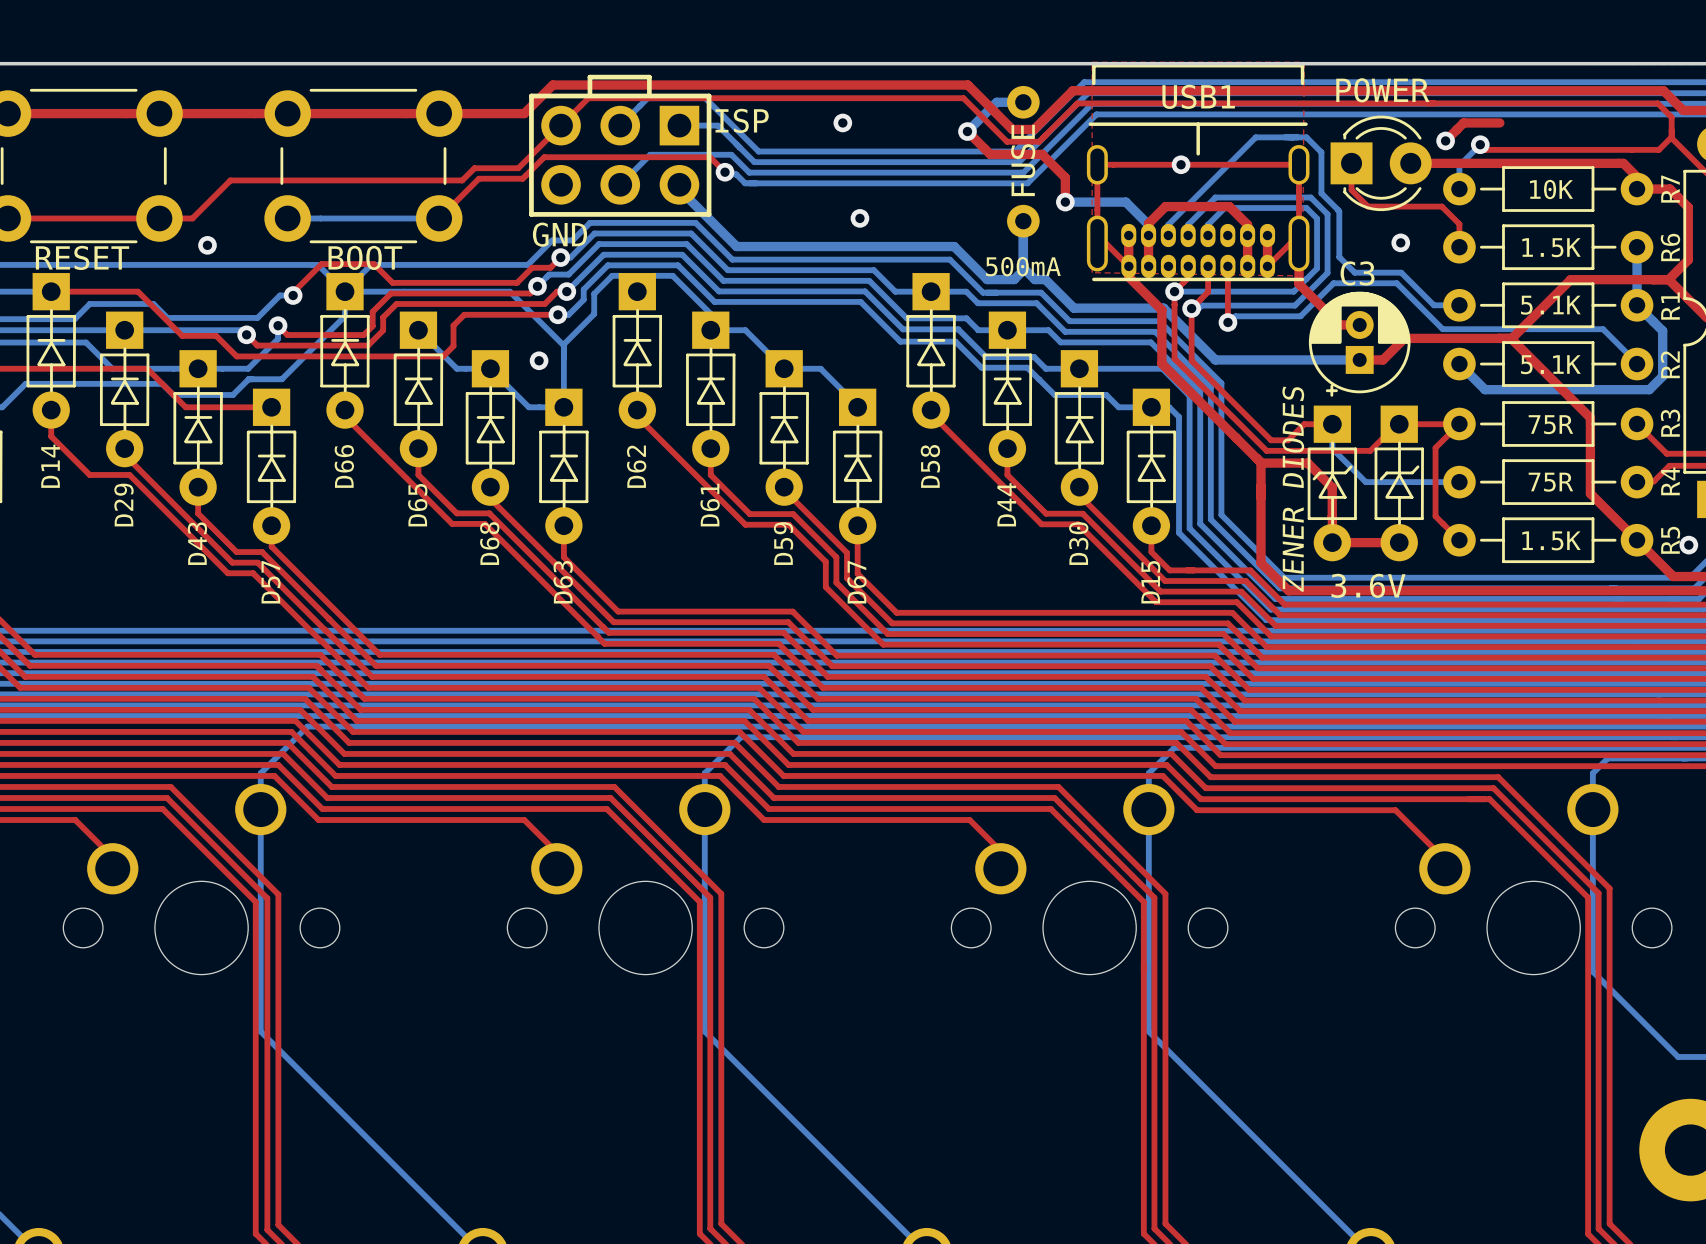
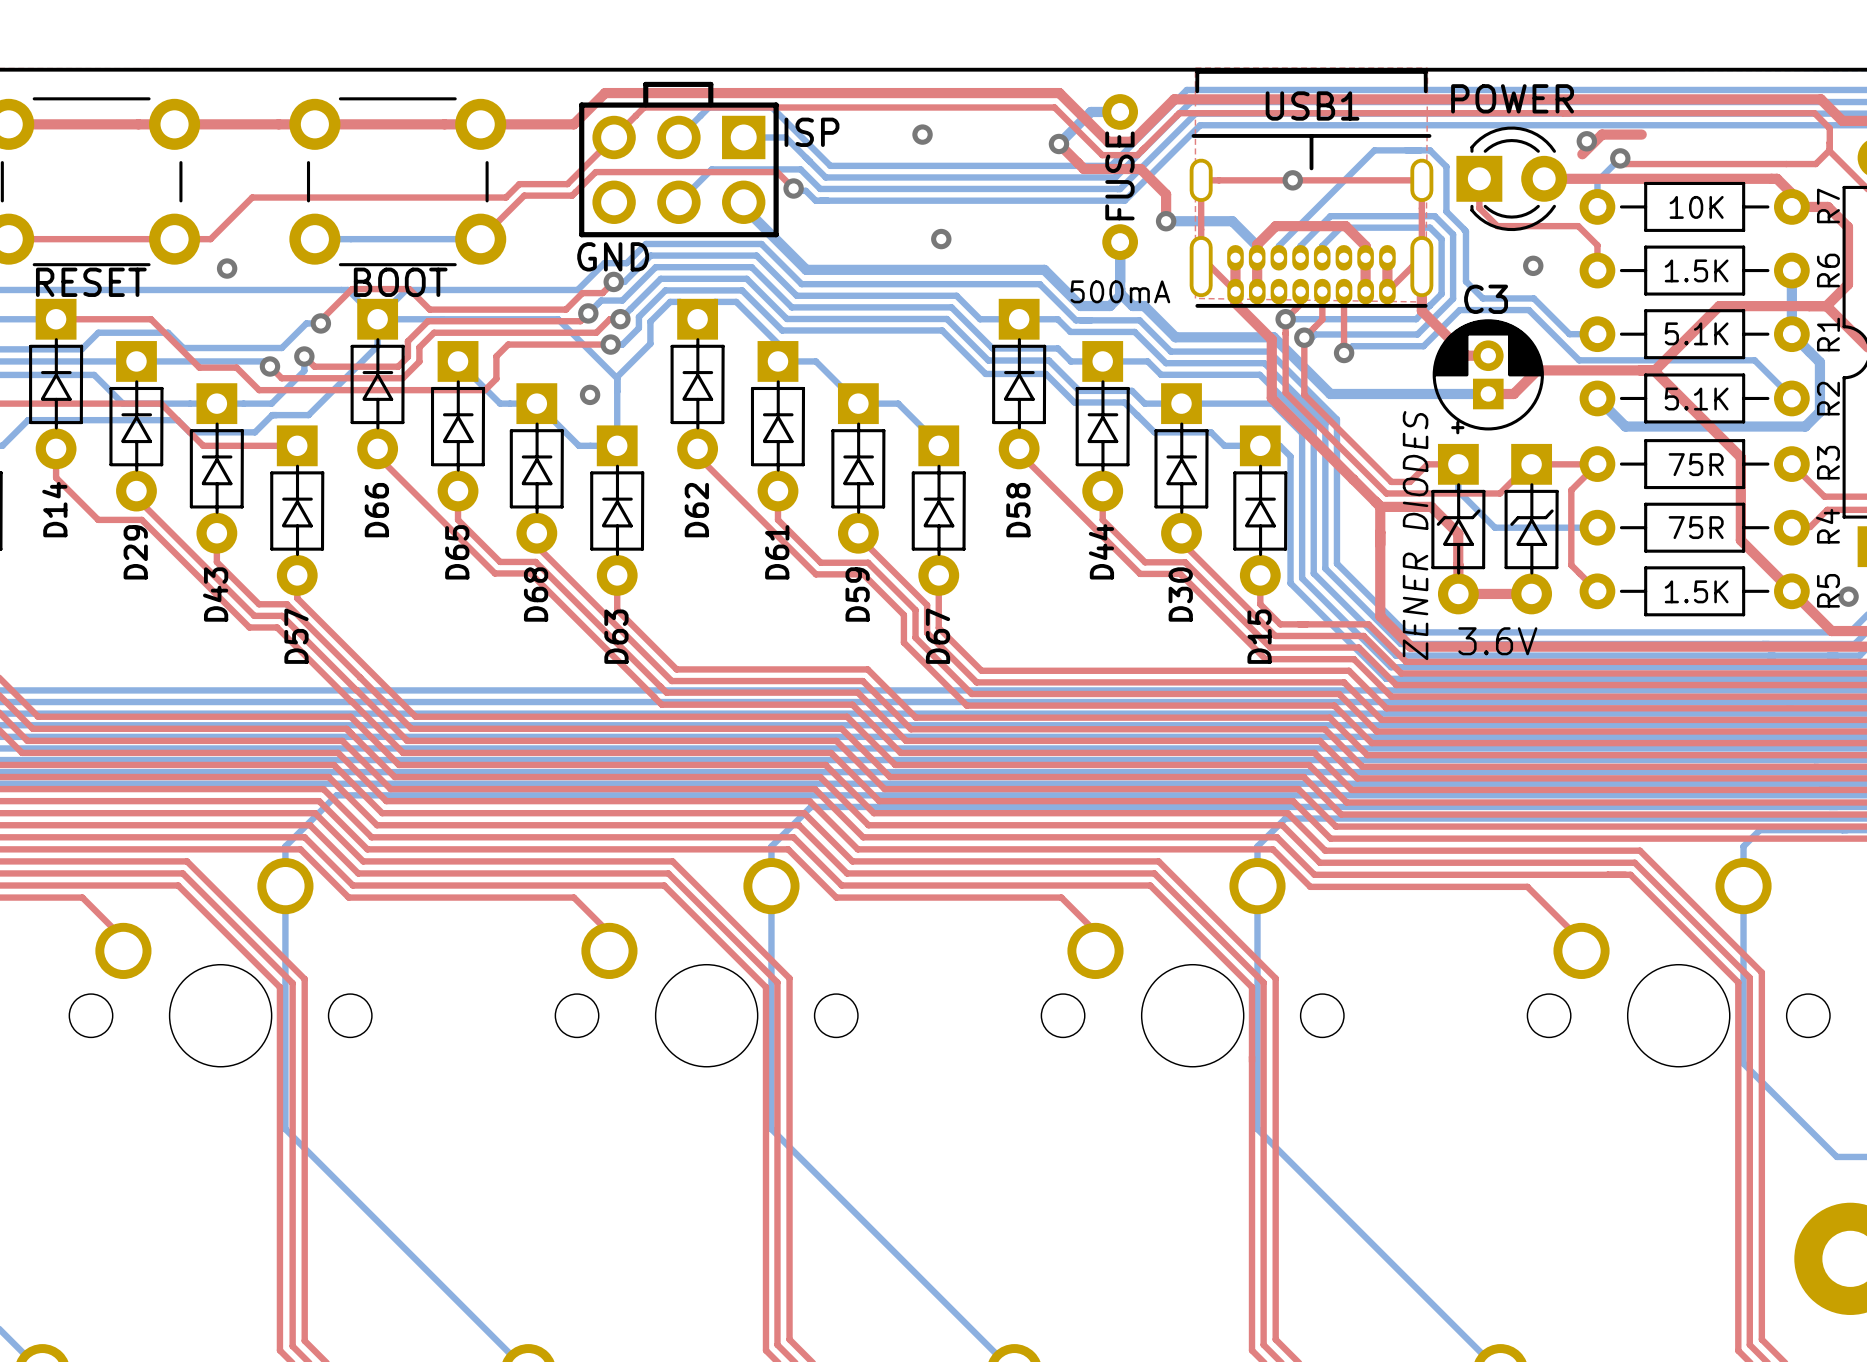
via position: (1445, 140) -> (1586, 141)

